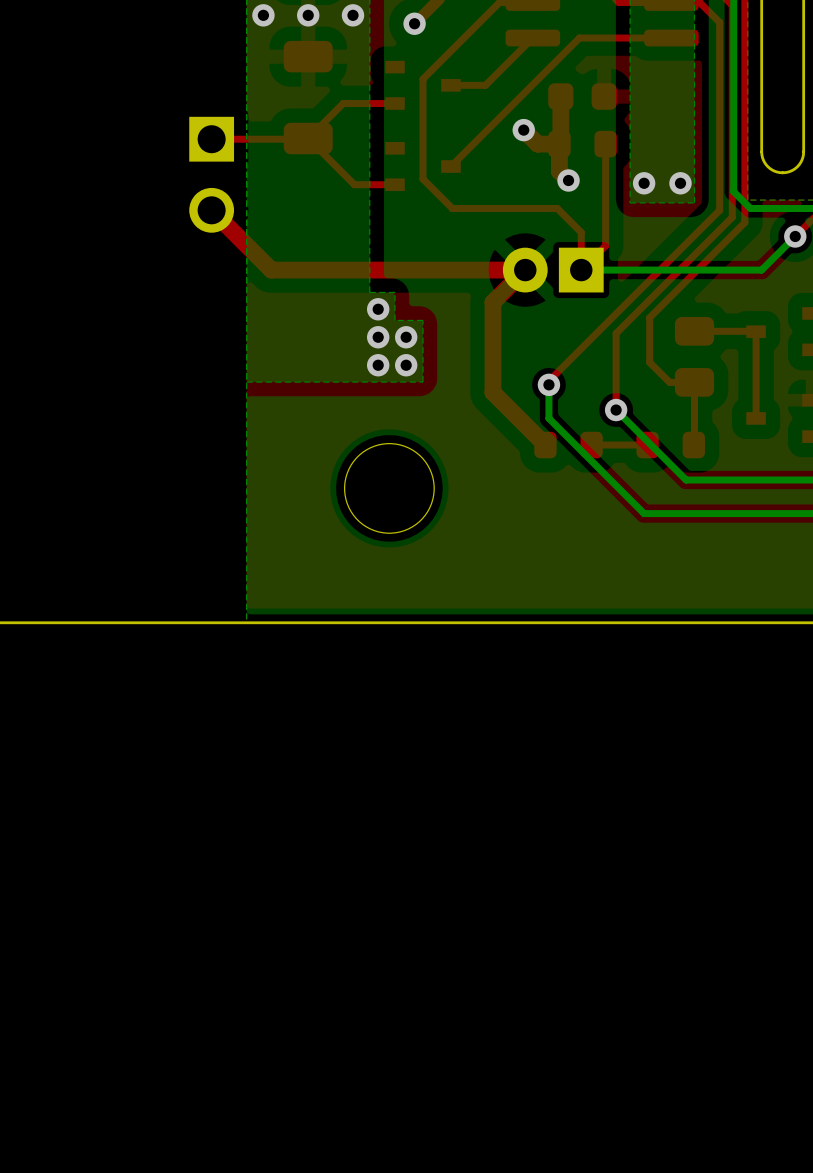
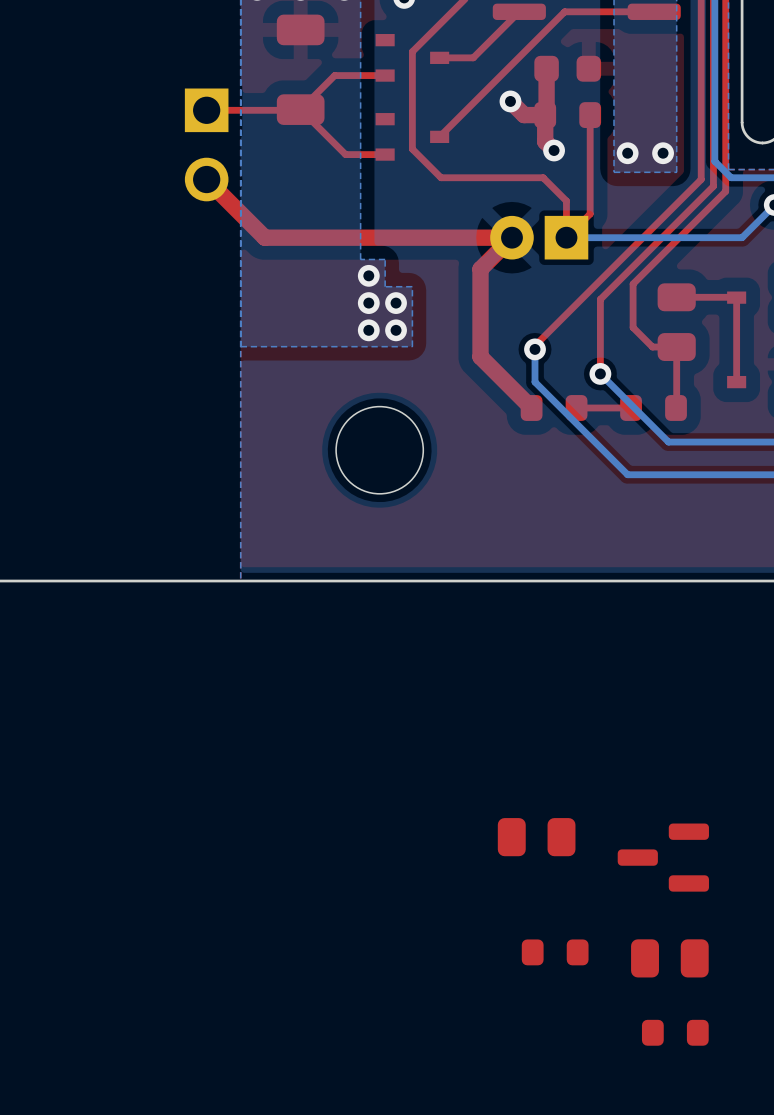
part: none -> (536, 837)
part: none -> (663, 857)
part: none -> (555, 952)
part: none -> (669, 958)
part: none -> (675, 1032)

